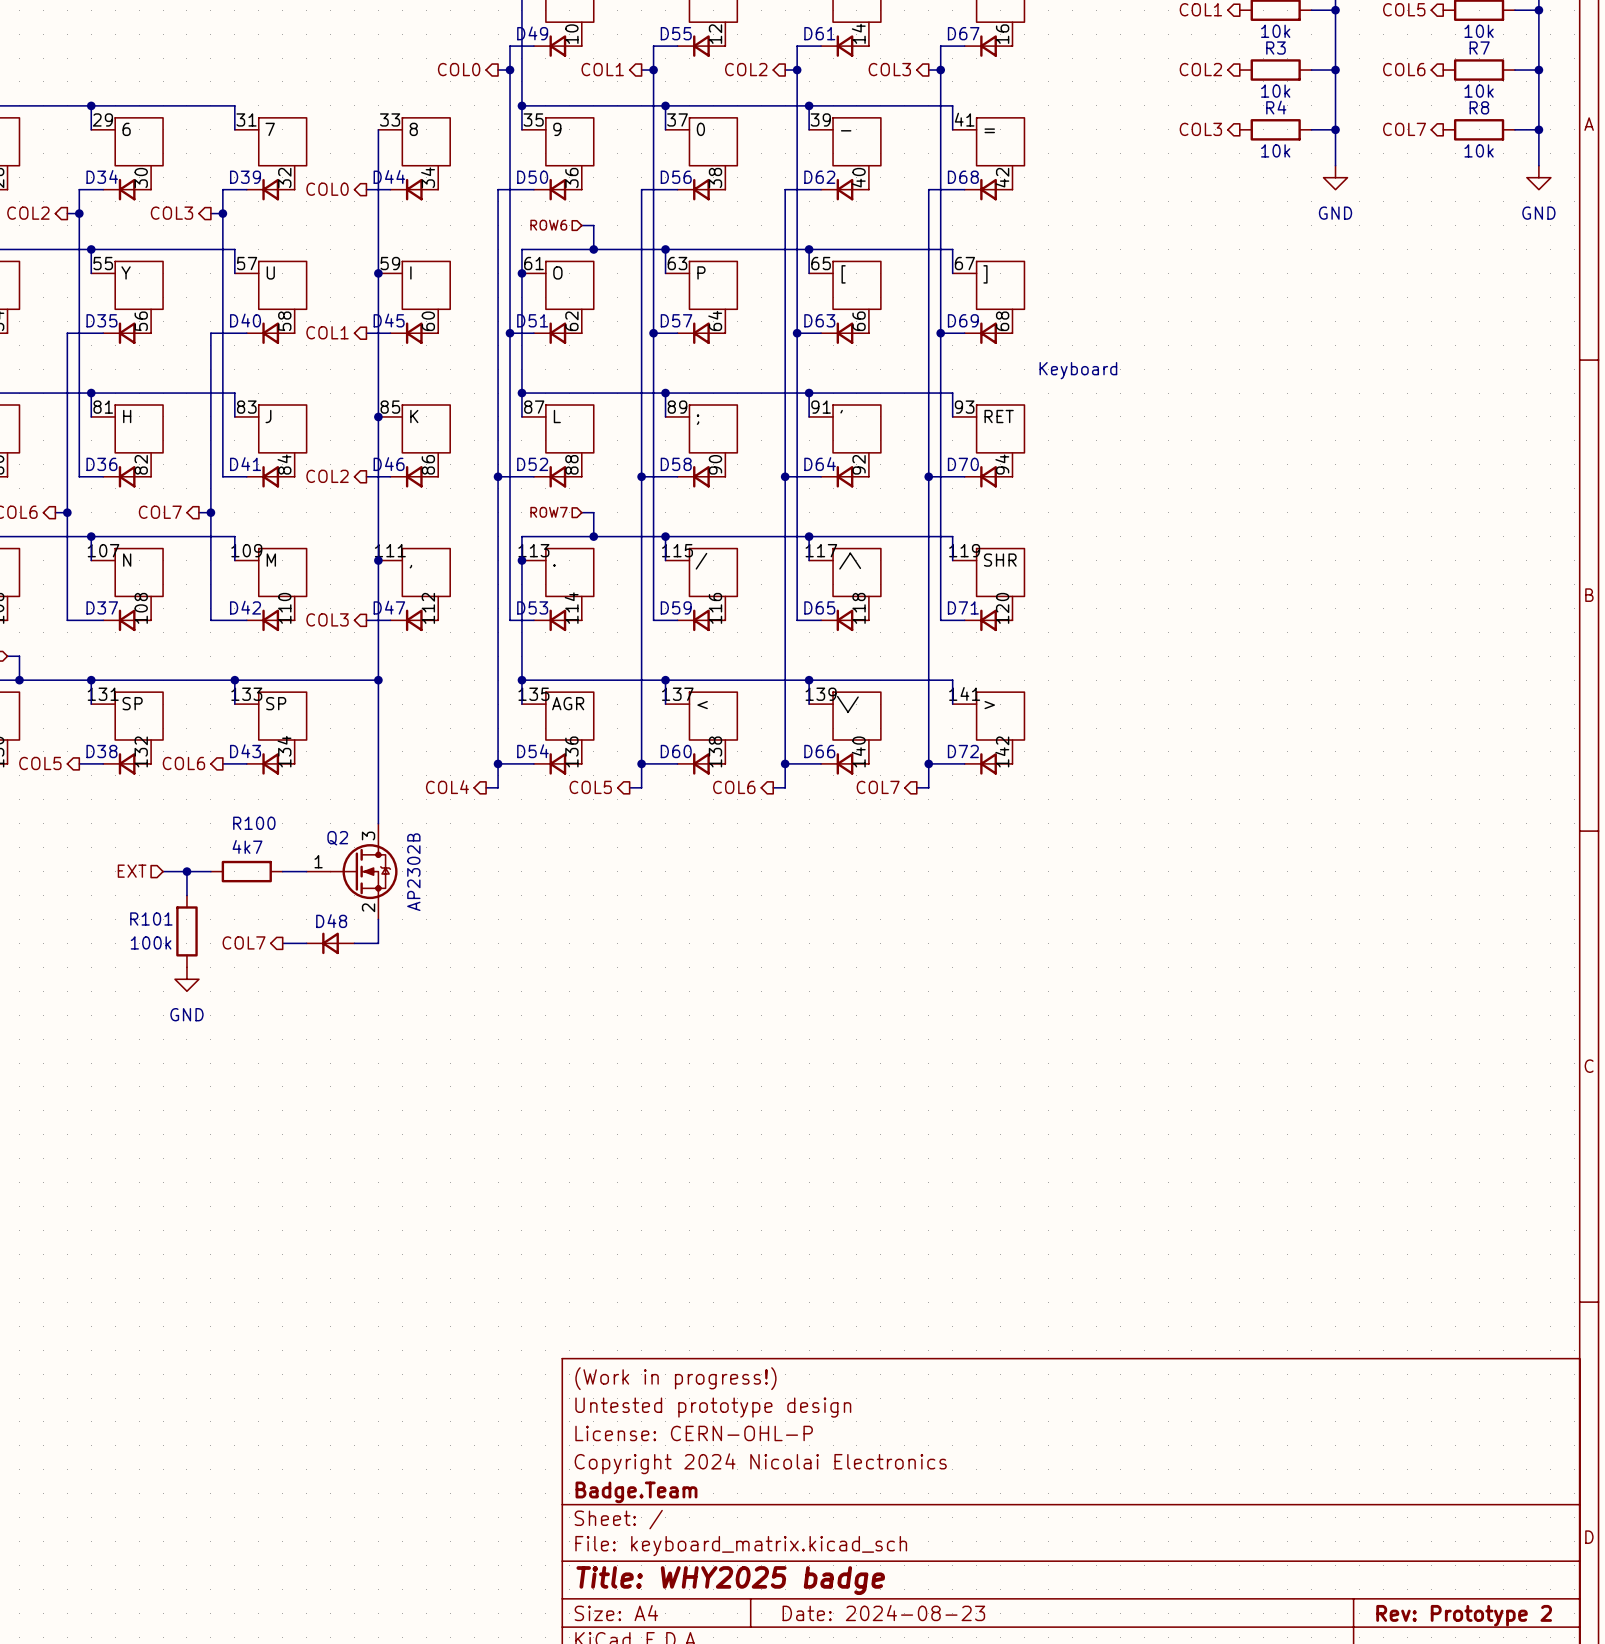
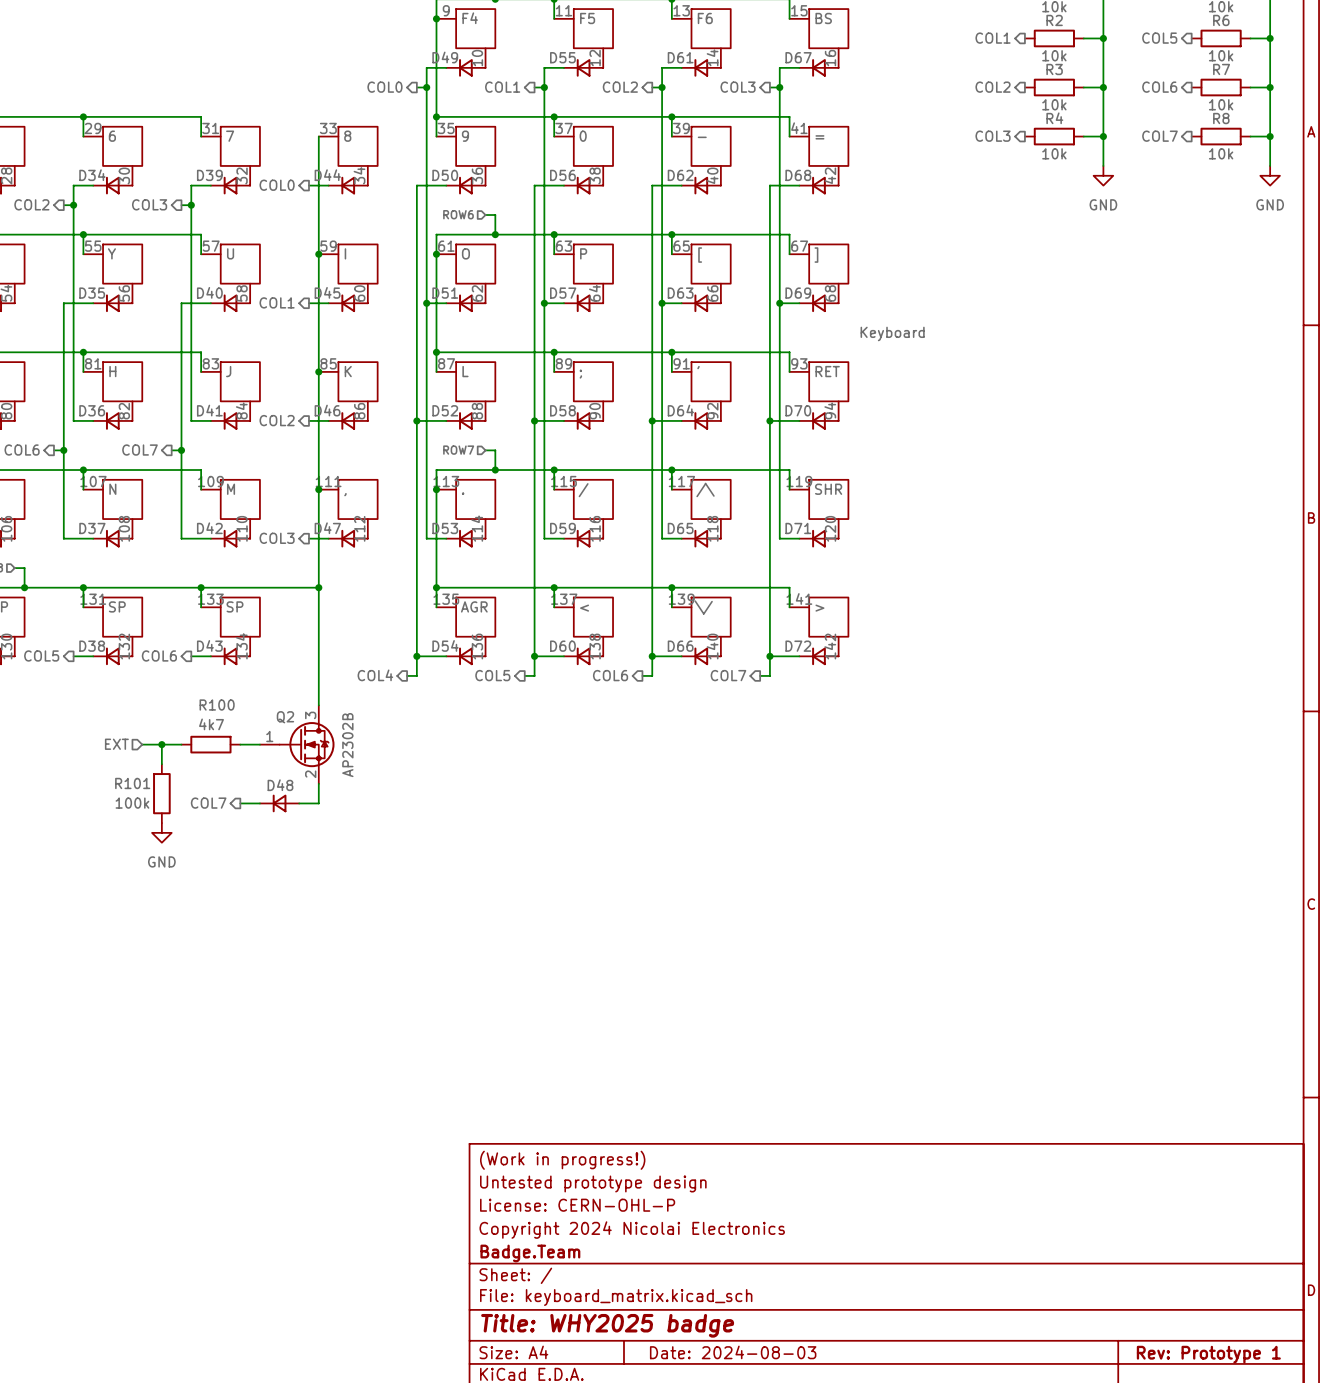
title block: Date: 2024-08-23 (883, 1613) -> Date: 2024-08-03 (733, 1352)
title block: Rev: Prototype 2 (1464, 1615) -> Rev: Prototype 1 (1208, 1354)

